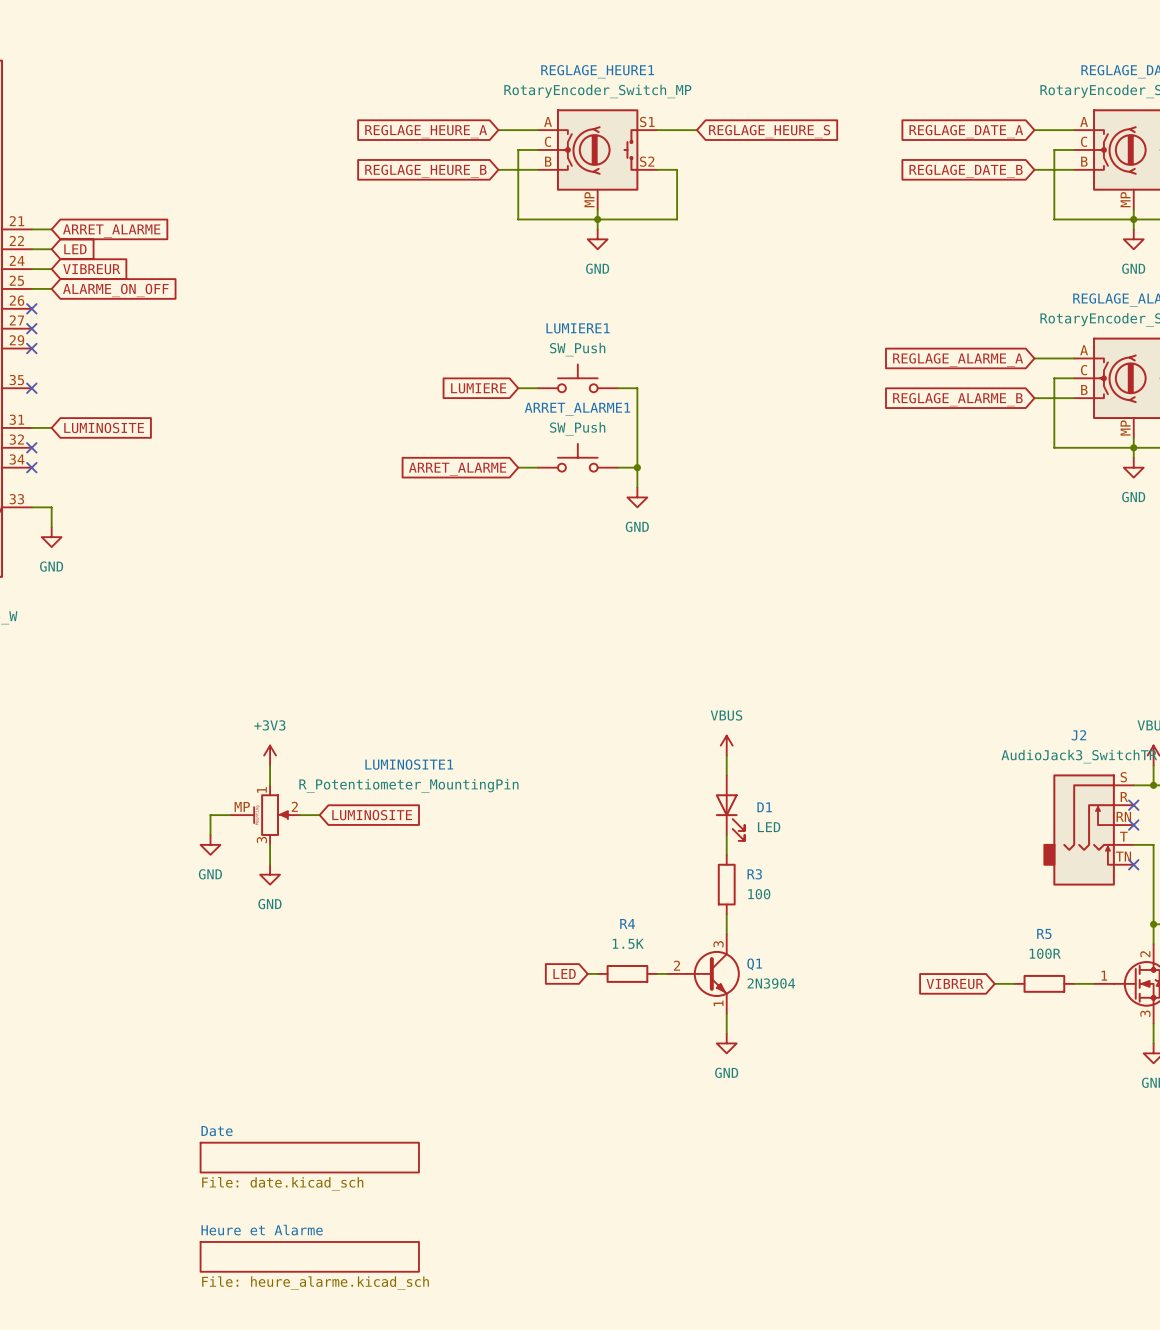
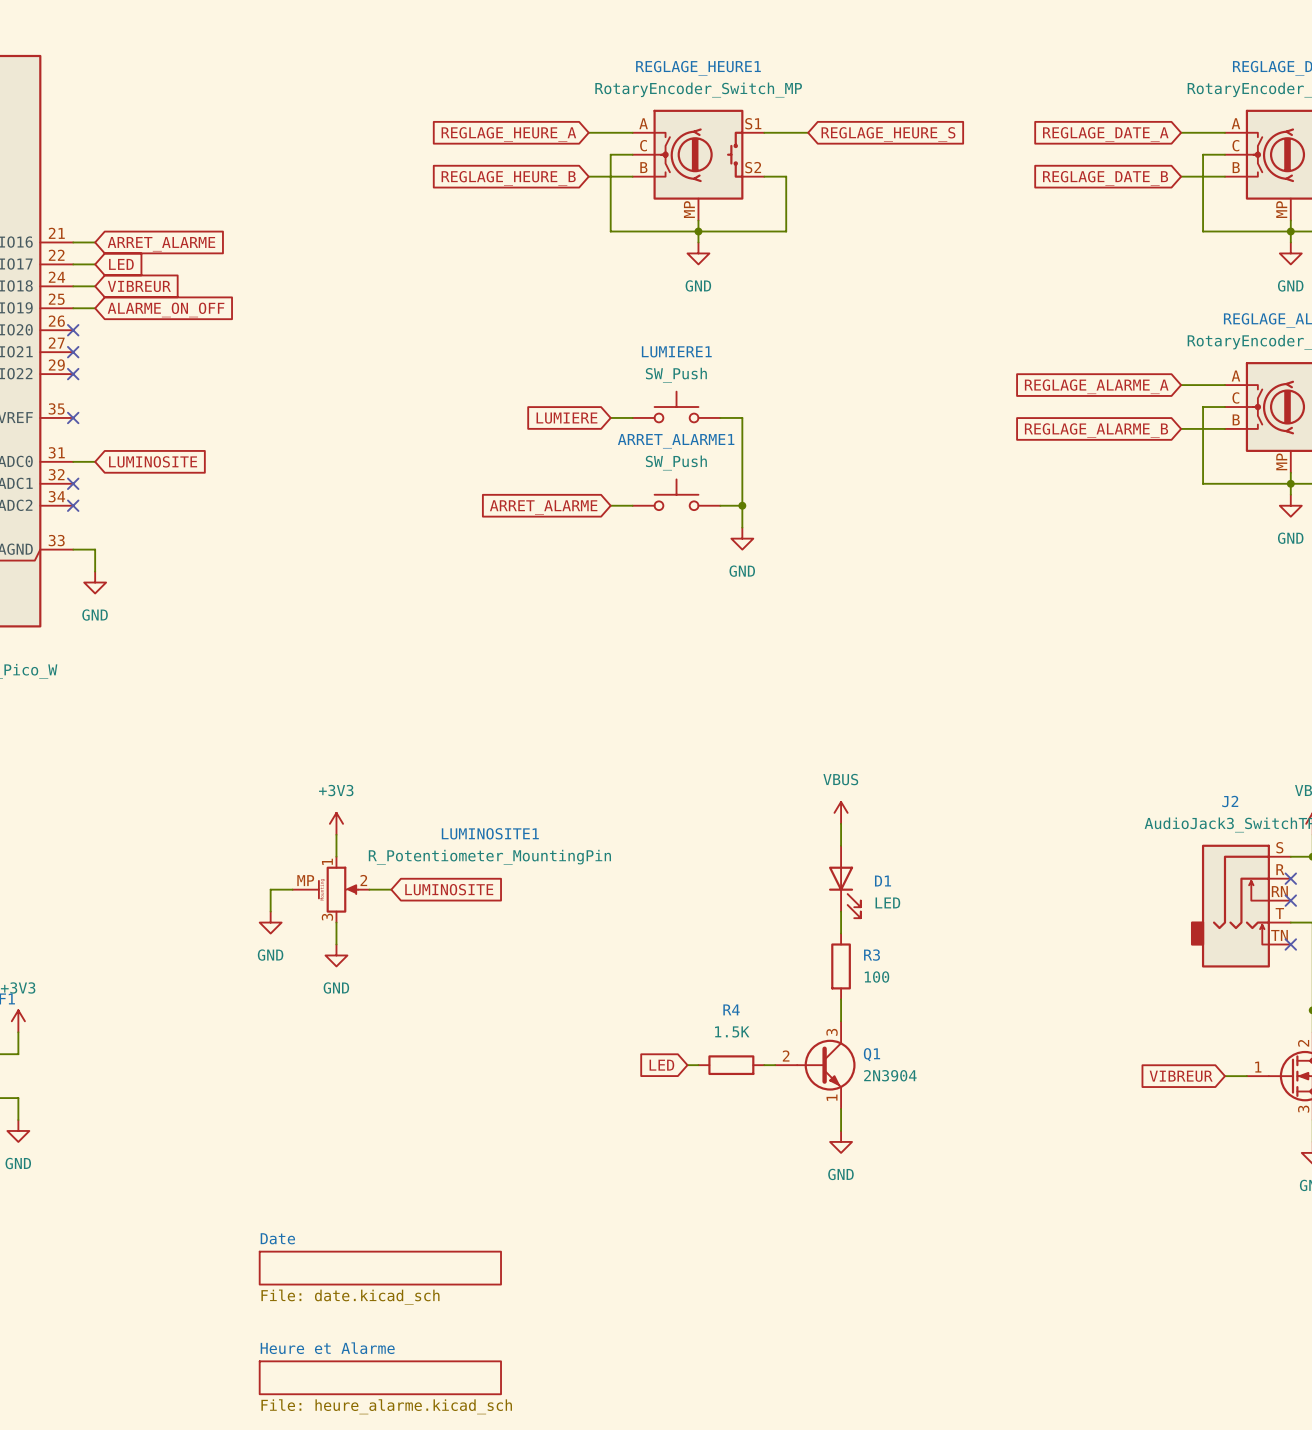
global label position: VIBREUR (955, 983) -> VIBREUR (1181, 1076)
wire: (994, 983) (1014, 983) -> none
R5: 100R (1044, 983) -> none

